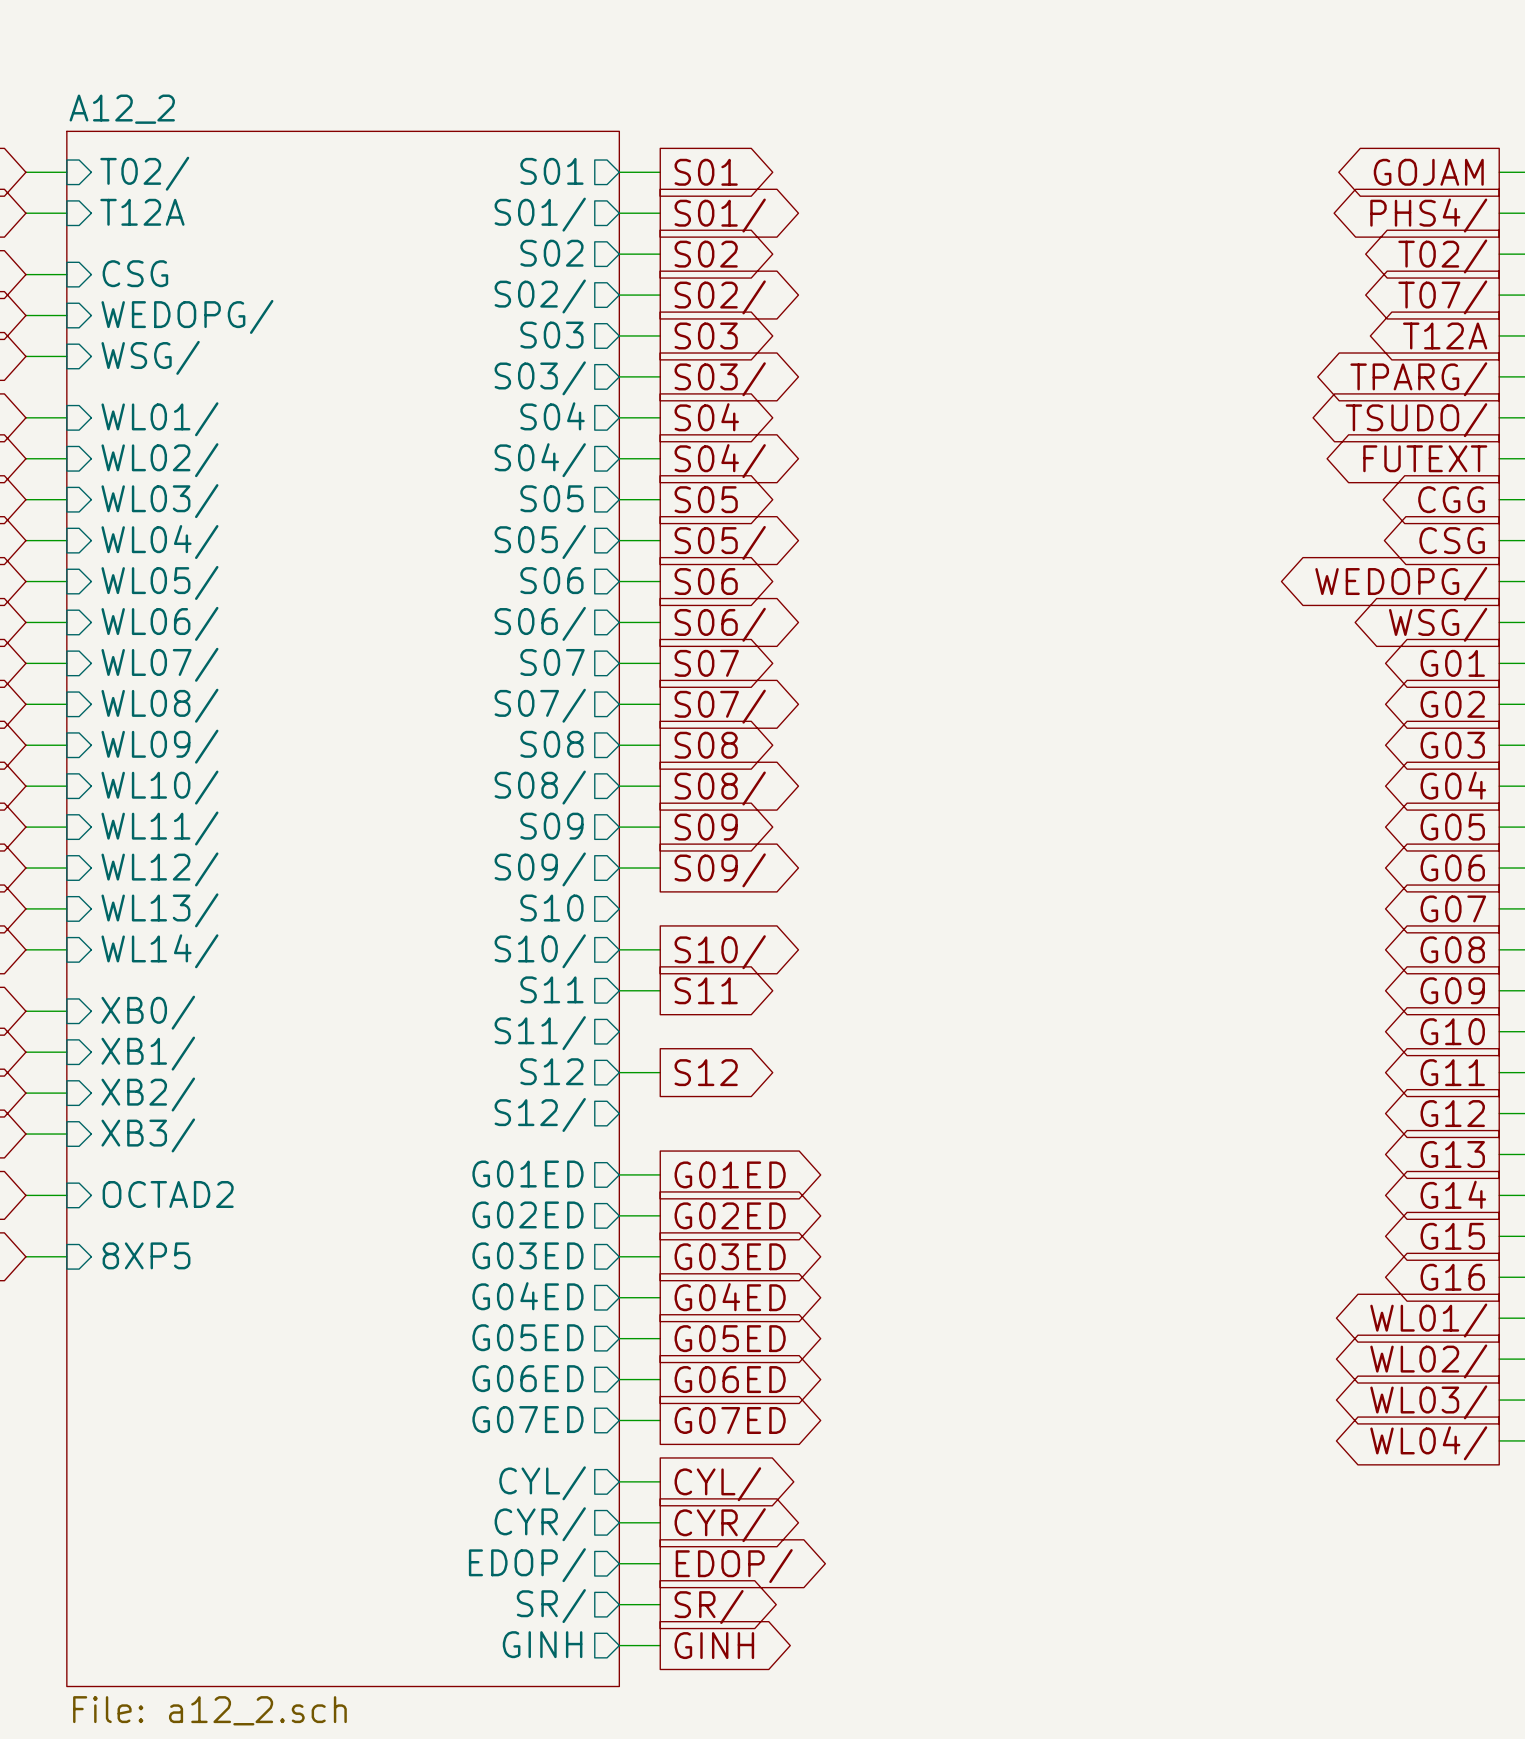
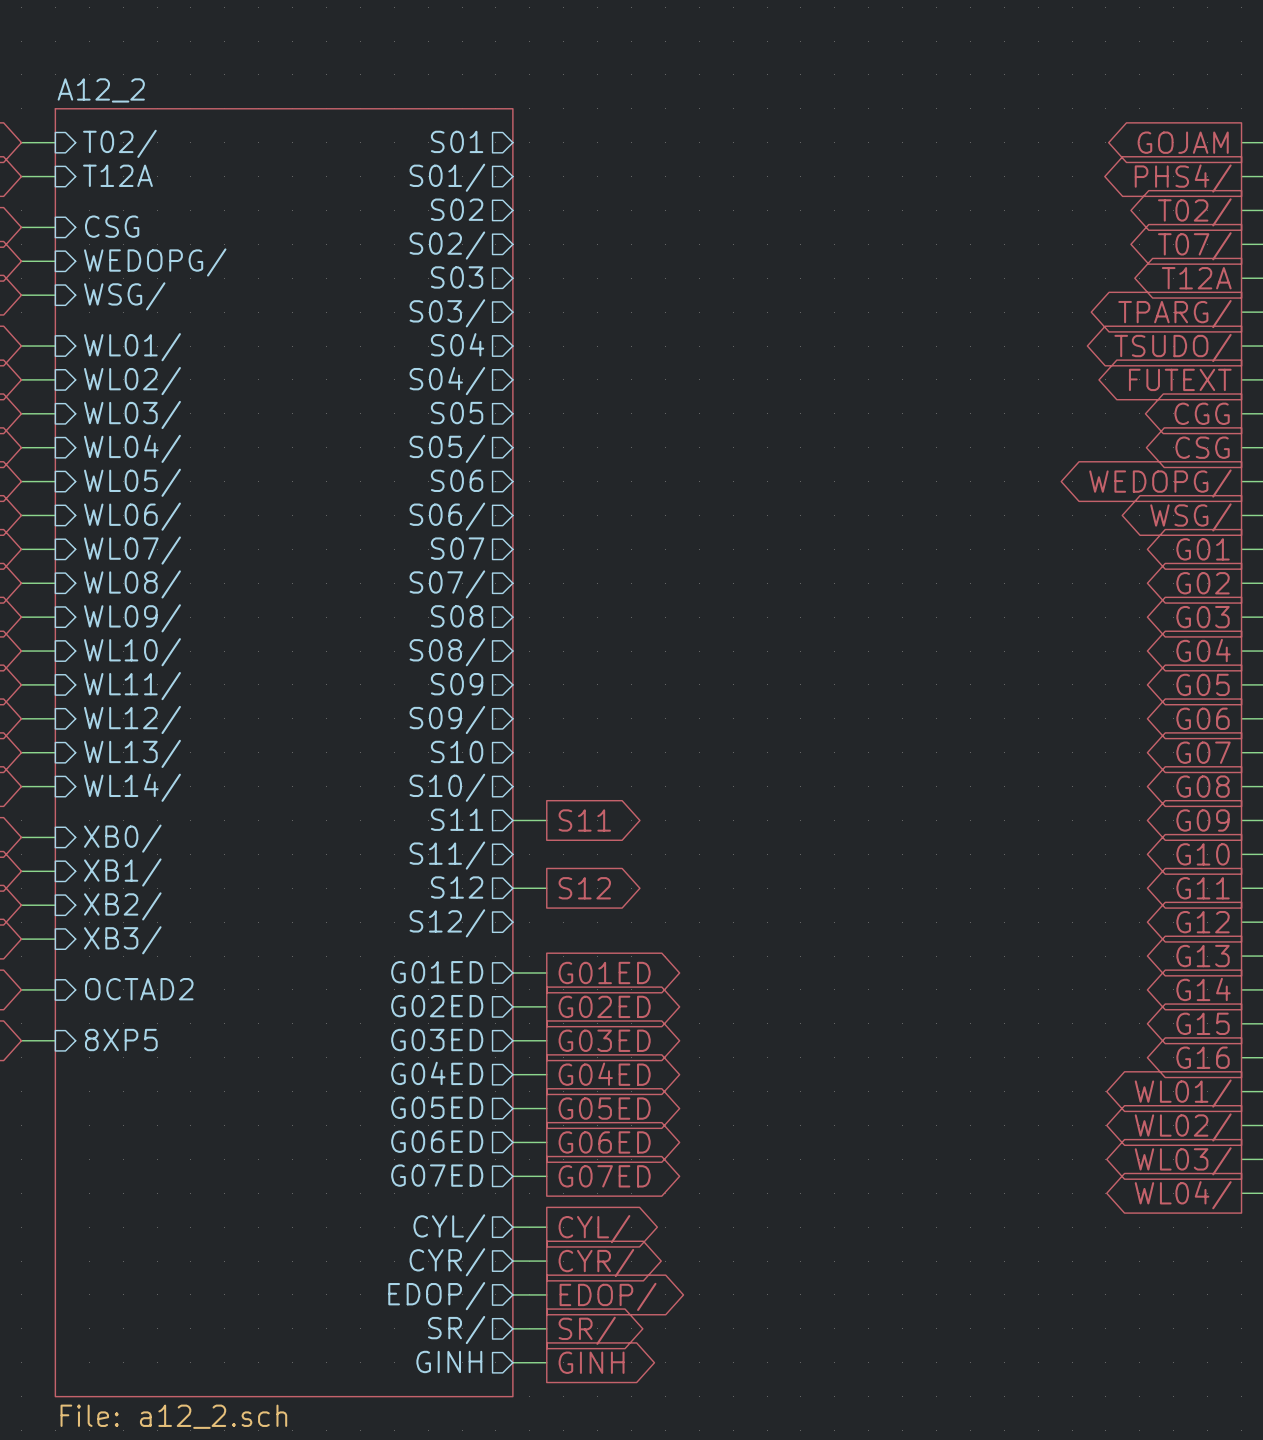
wire: (619, 172) (660, 172) -> none
global label: S01 (706, 172) -> none
wire: (619, 213) (660, 213) -> none
global label: S01/ (720, 215) -> none
wire: (619, 254) (660, 254) -> none
global label: S02 (706, 254) -> none
wire: (619, 295) (660, 295) -> none
global label: S02/ (720, 297) -> none
wire: (619, 335) (660, 335) -> none
global label: S03 (706, 335) -> none
wire: (619, 376) (660, 376) -> none
global label: S03/ (720, 379) -> none
wire: (619, 417) (660, 417) -> none
global label: S04 (706, 417) -> none
wire: (619, 458) (660, 458) -> none
global label: S04/ (720, 461) -> none
wire: (619, 499) (660, 499) -> none
global label: S05 (706, 499) -> none
wire: (619, 540) (660, 540) -> none
global label: S05/ (720, 542) -> none
wire: (619, 581) (660, 581) -> none
global label: S06 (706, 581) -> none
wire: (619, 622) (660, 622) -> none
global label: S06/ (720, 624) -> none
wire: (619, 663) (660, 663) -> none
global label: S07 (706, 663) -> none
wire: (619, 704) (660, 704) -> none
global label: S07/ (720, 706) -> none
wire: (619, 745) (660, 745) -> none
global label: S08 (706, 745) -> none
wire: (619, 786) (660, 786) -> none
global label: S08/ (720, 788) -> none
wire: (619, 827) (660, 827) -> none
global label: S09 (706, 827) -> none
wire: (619, 868) (660, 868) -> none
global label: S09/ (720, 870) -> none
wire: (619, 949) (660, 949) -> none
global label: S10/ (720, 952) -> none

